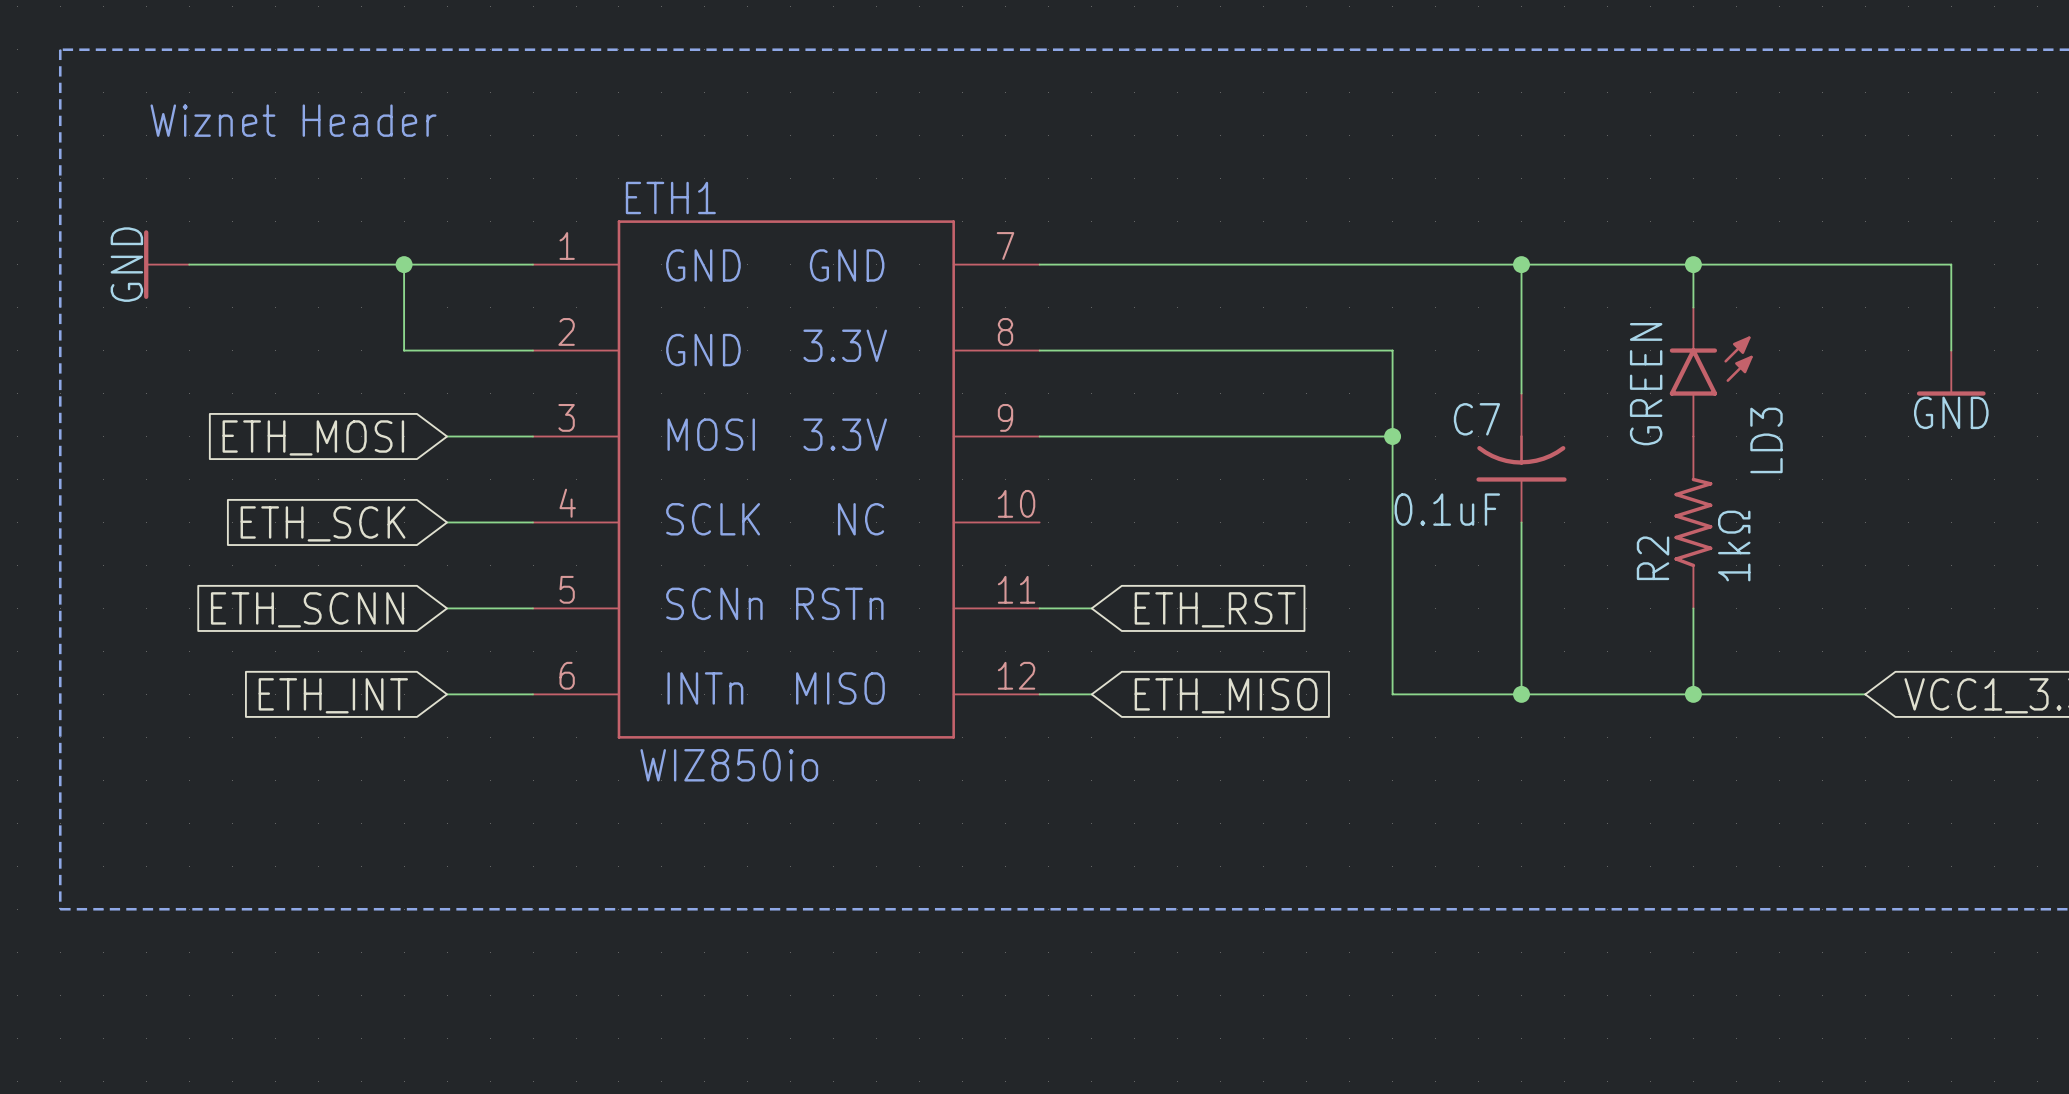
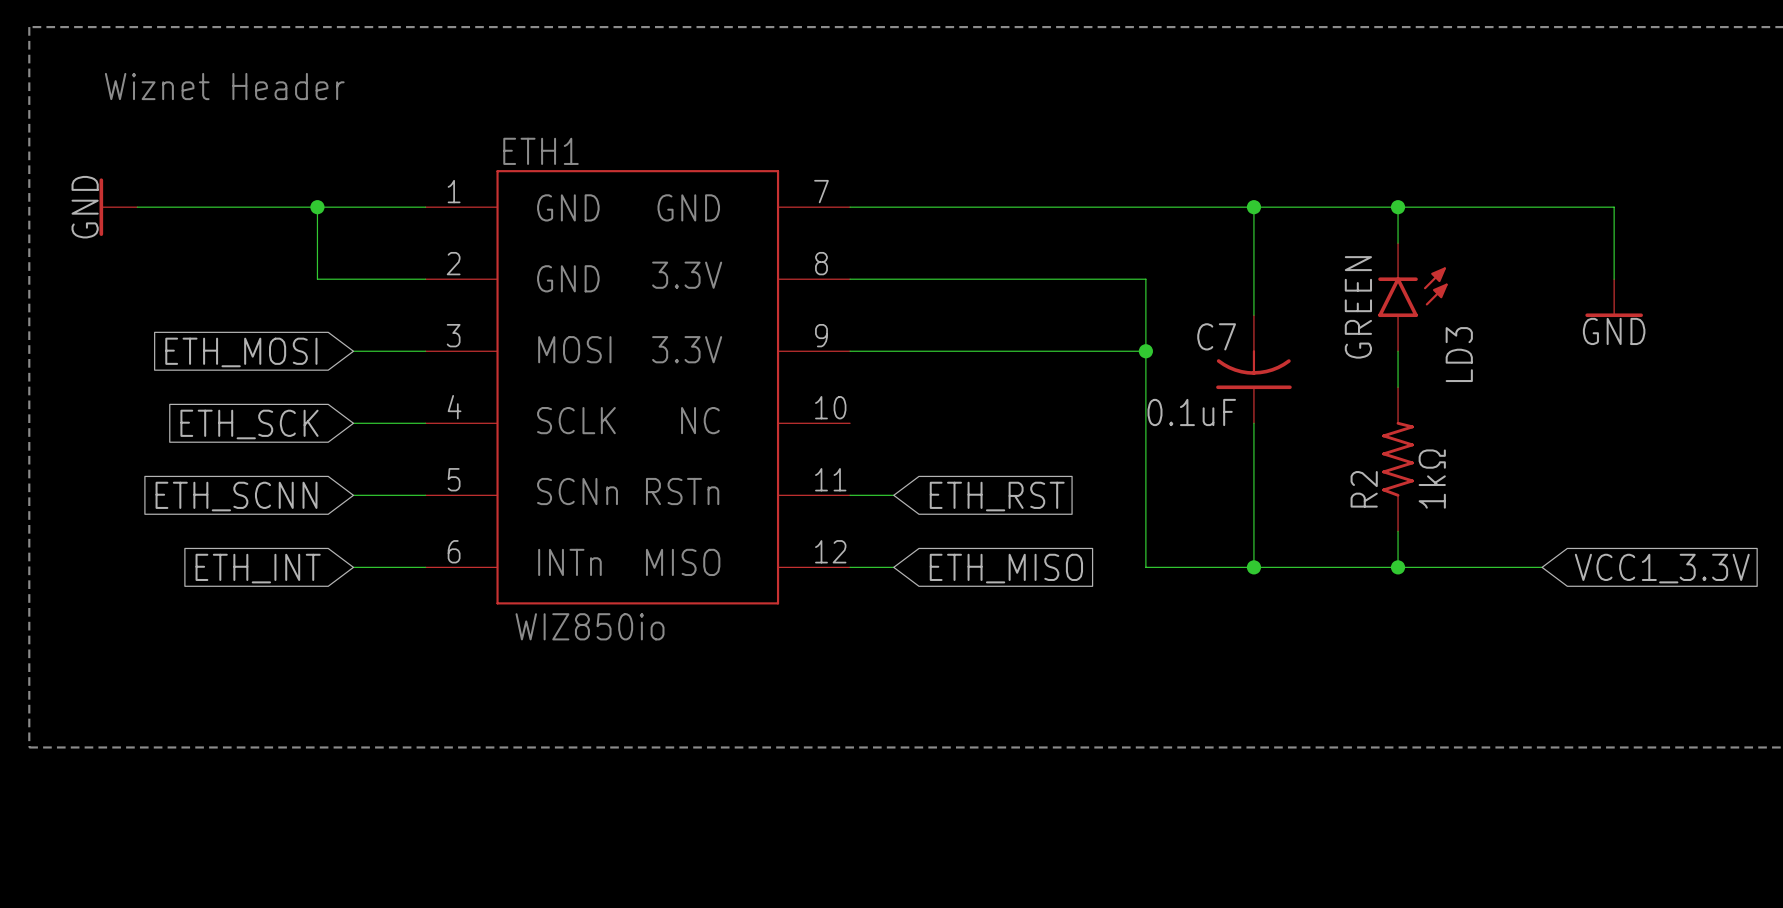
R2 position: (1693, 522) -> (1398, 459)

